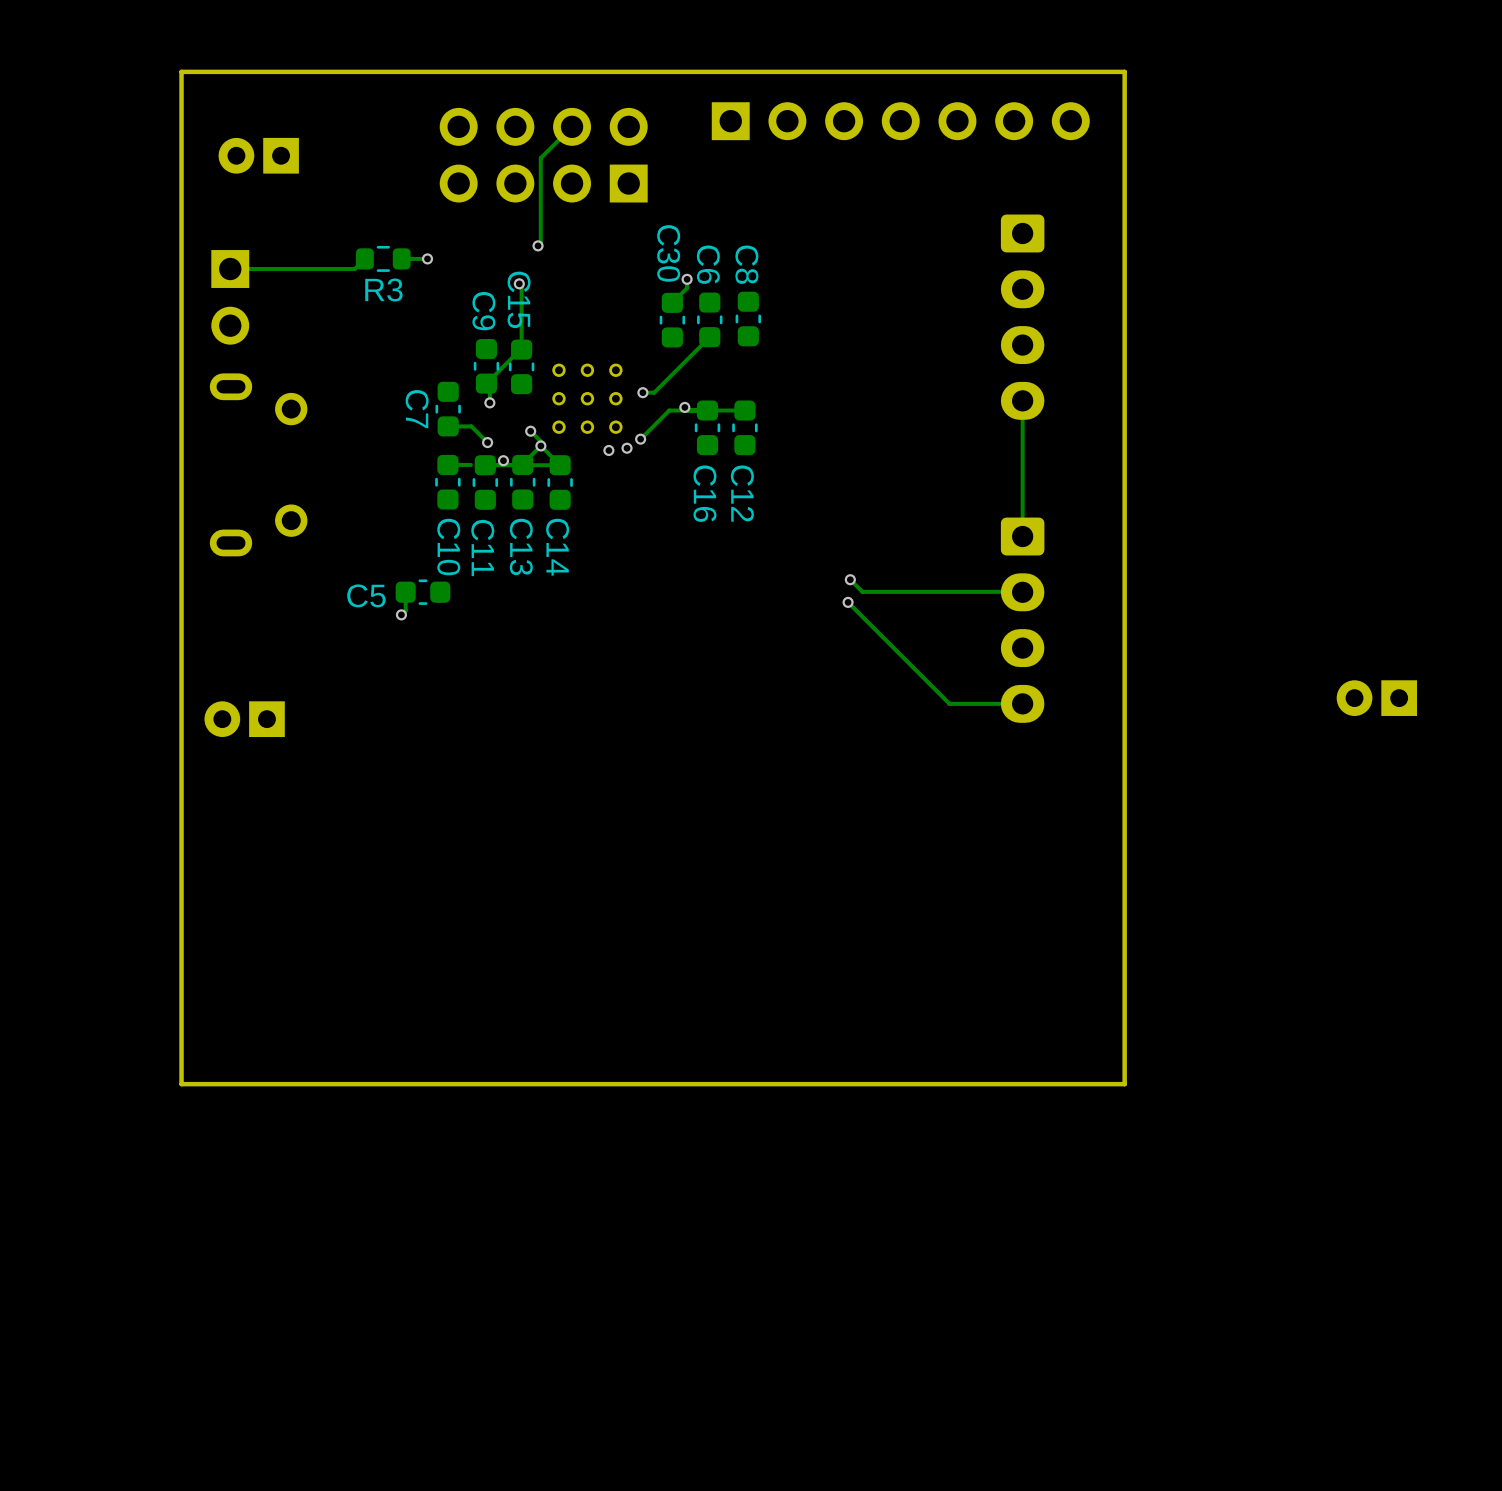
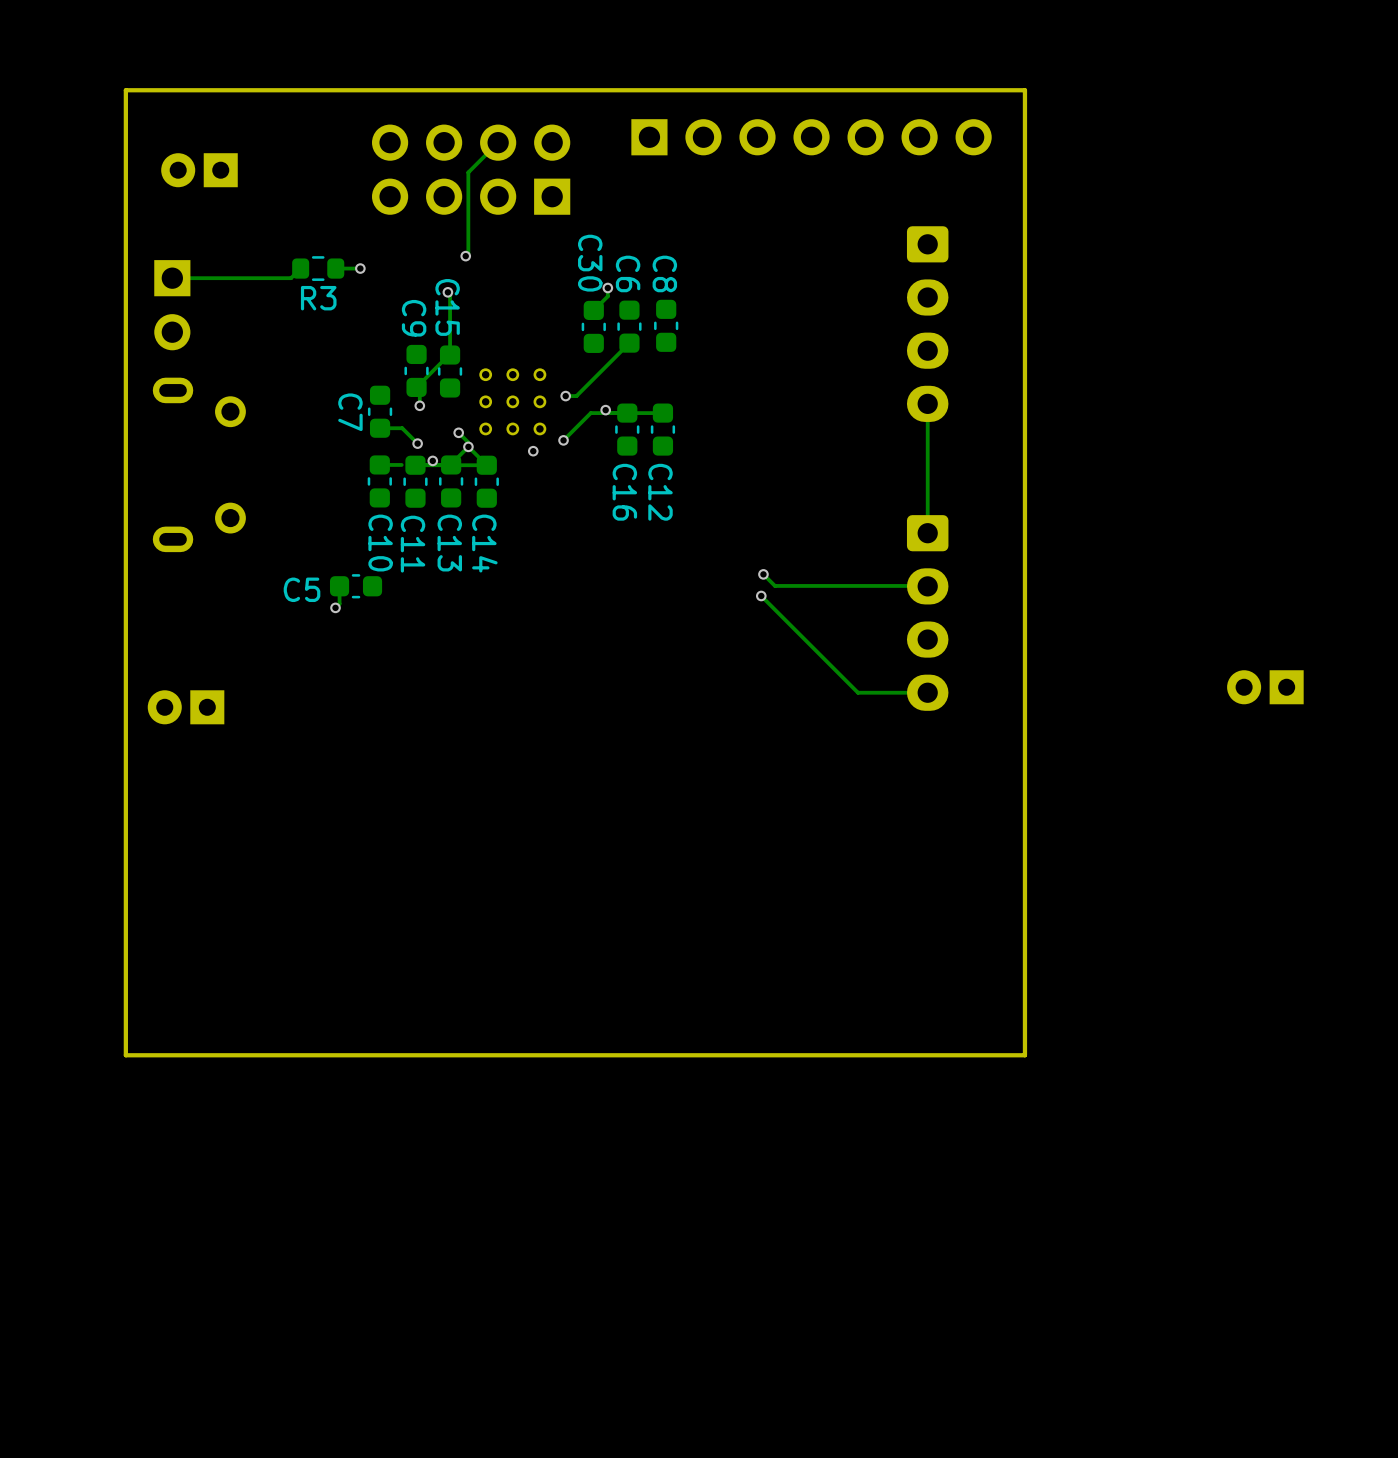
via: (627, 448) -> none

